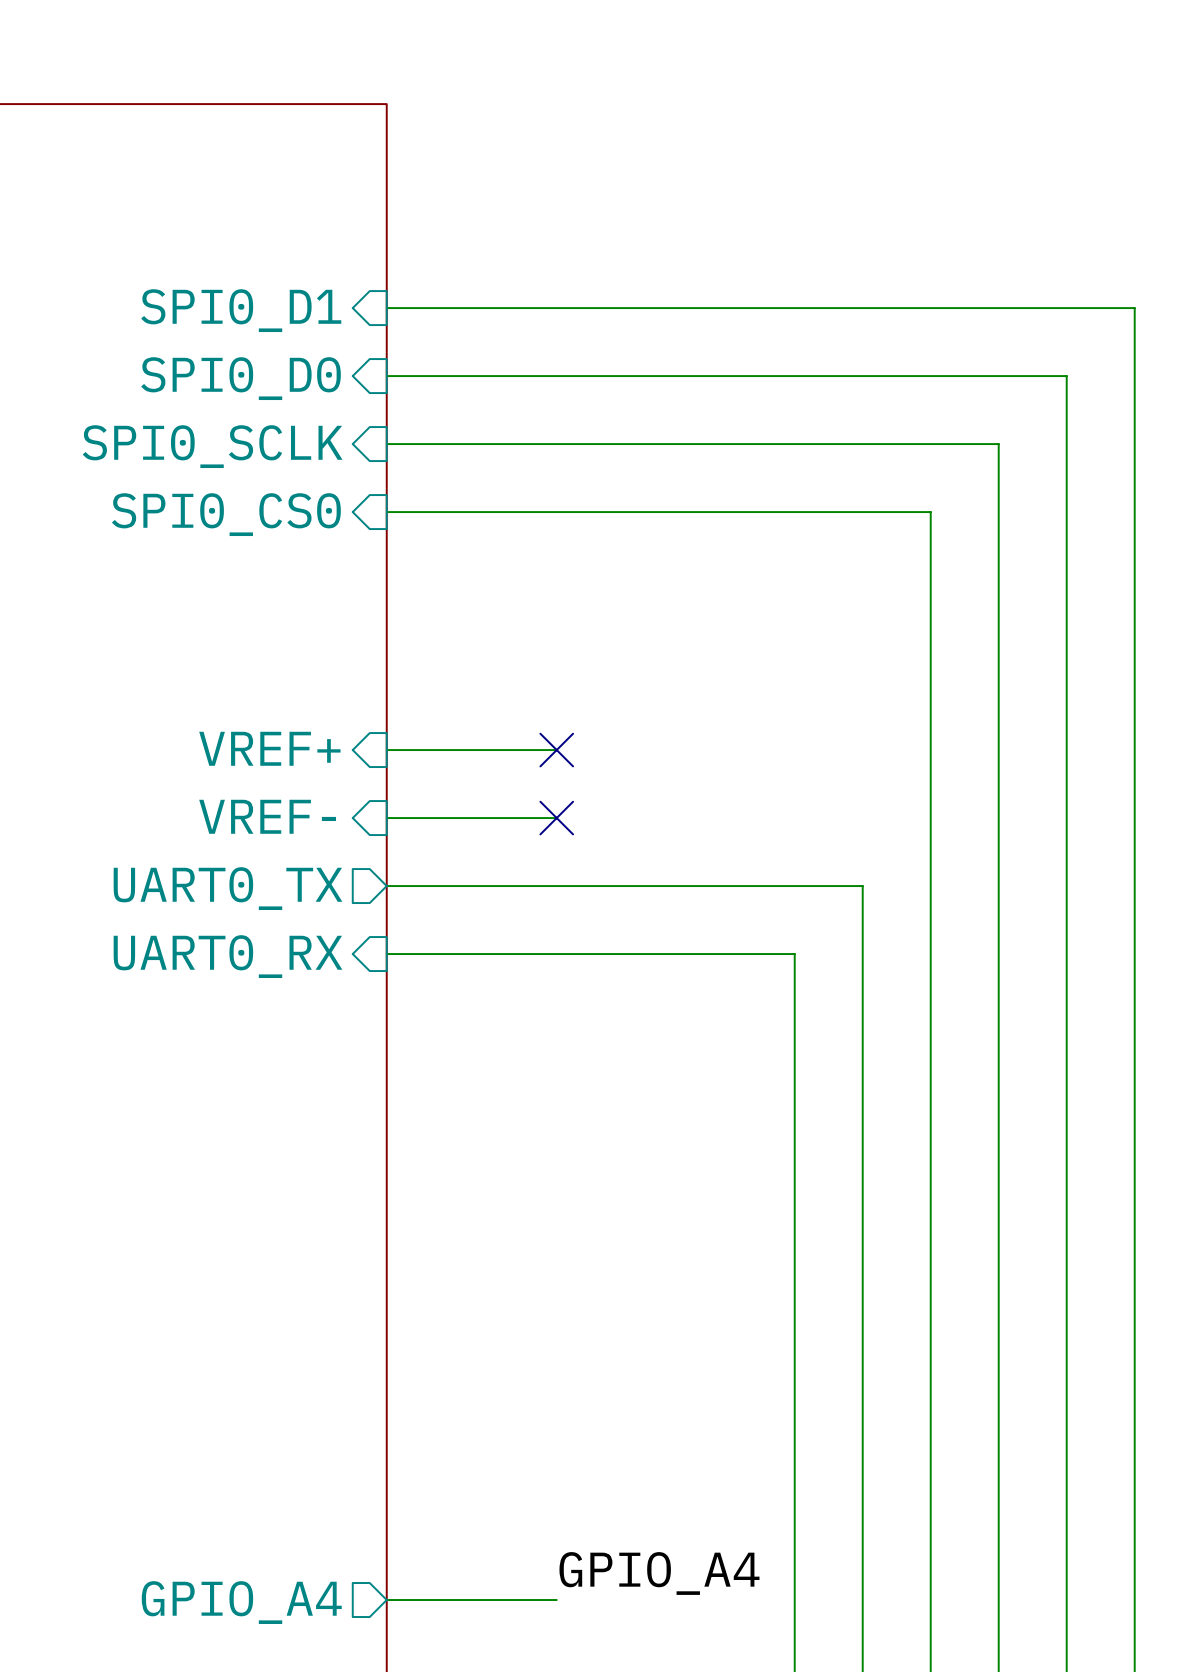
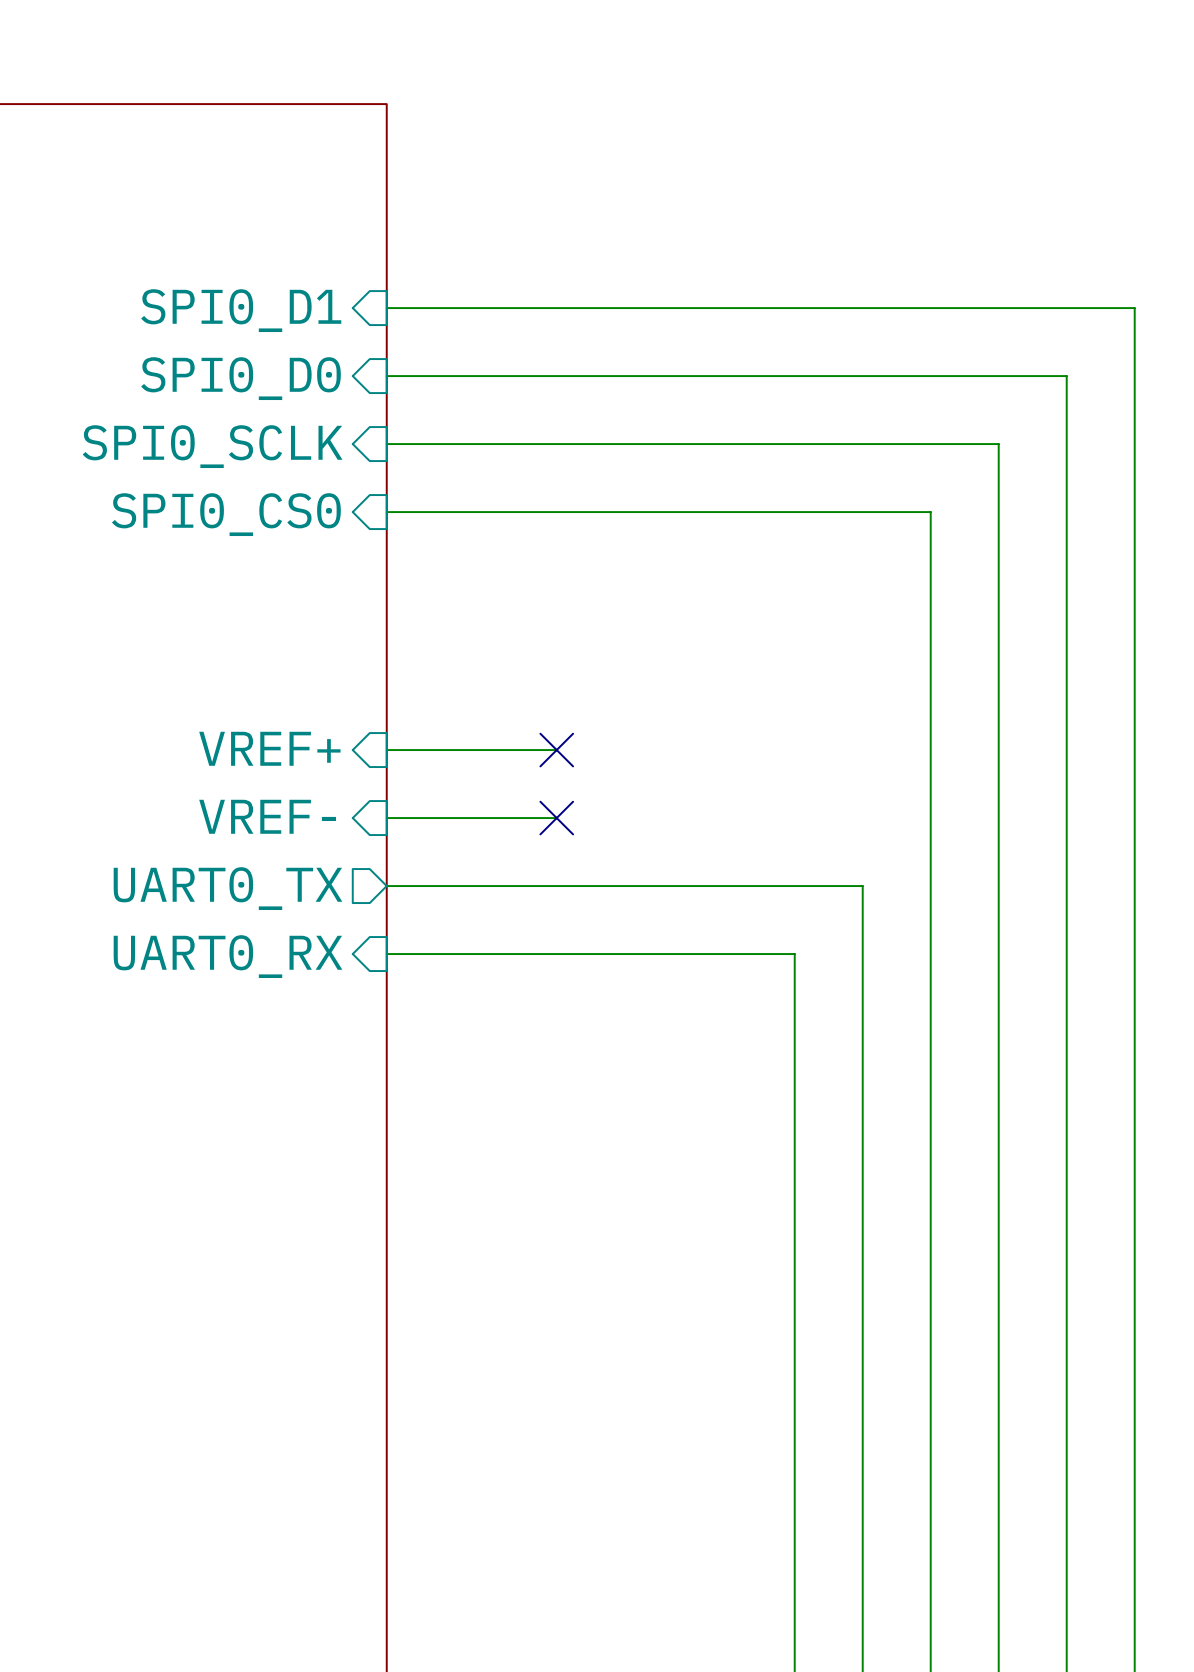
label: GPIO_A4 (659, 1573) -> none
wire: (386, 1600) (556, 1600) -> none
sheet pin: GPIO_A4 (241, 1602) -> none

